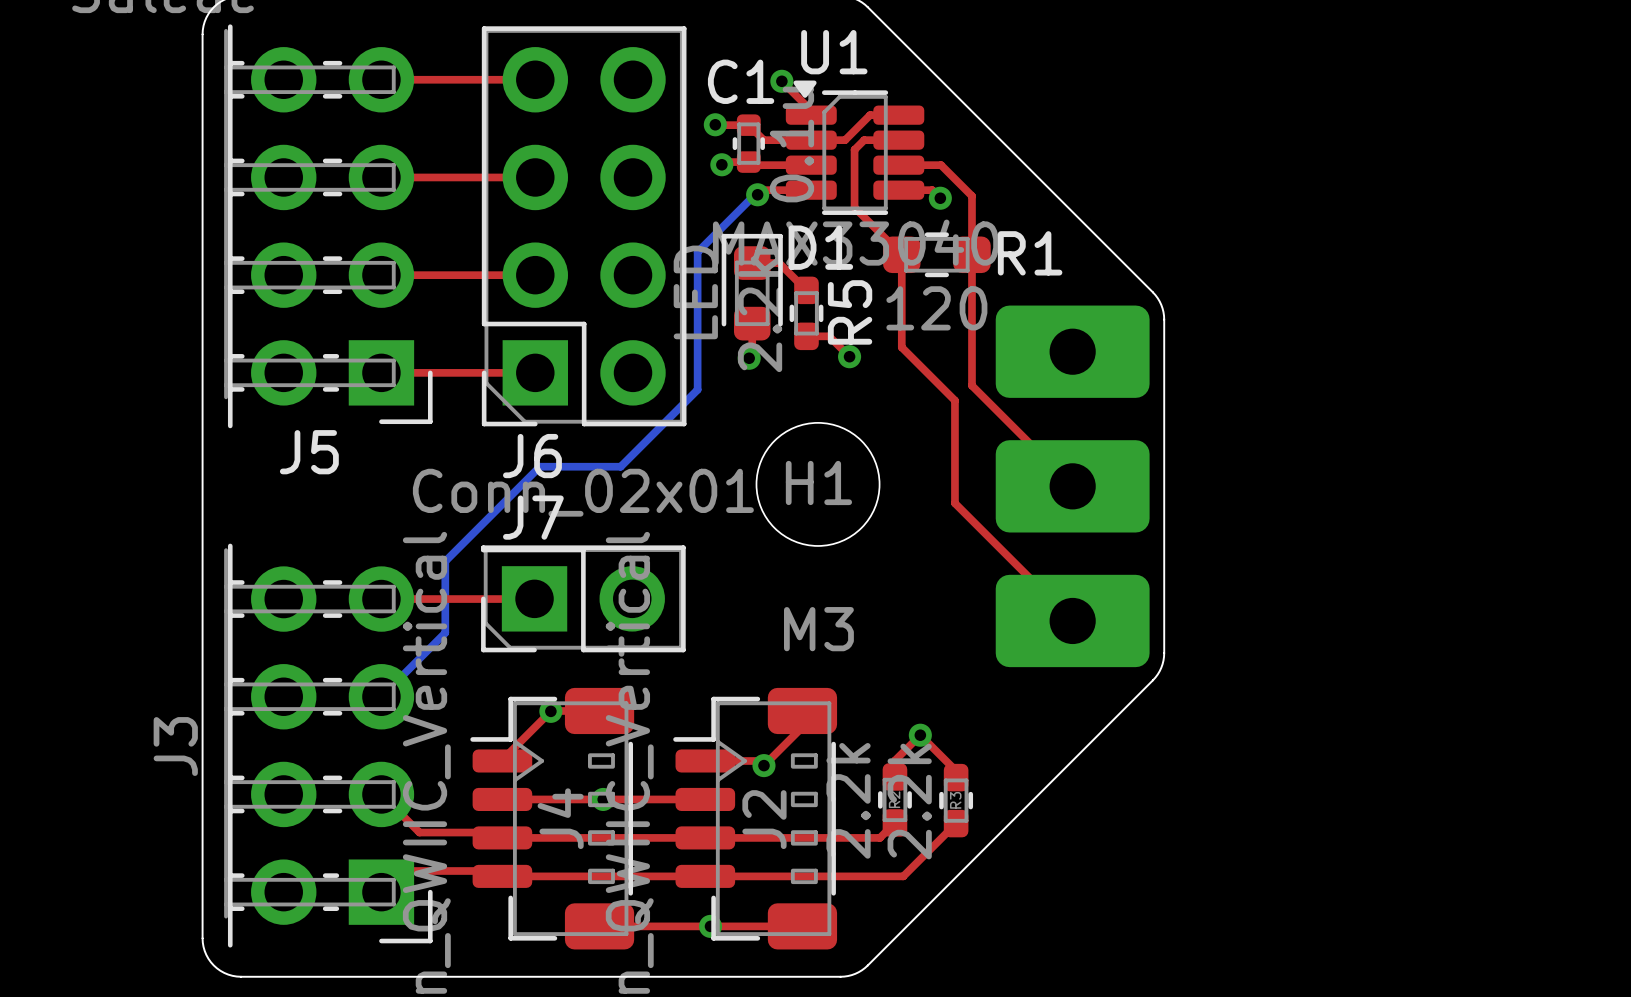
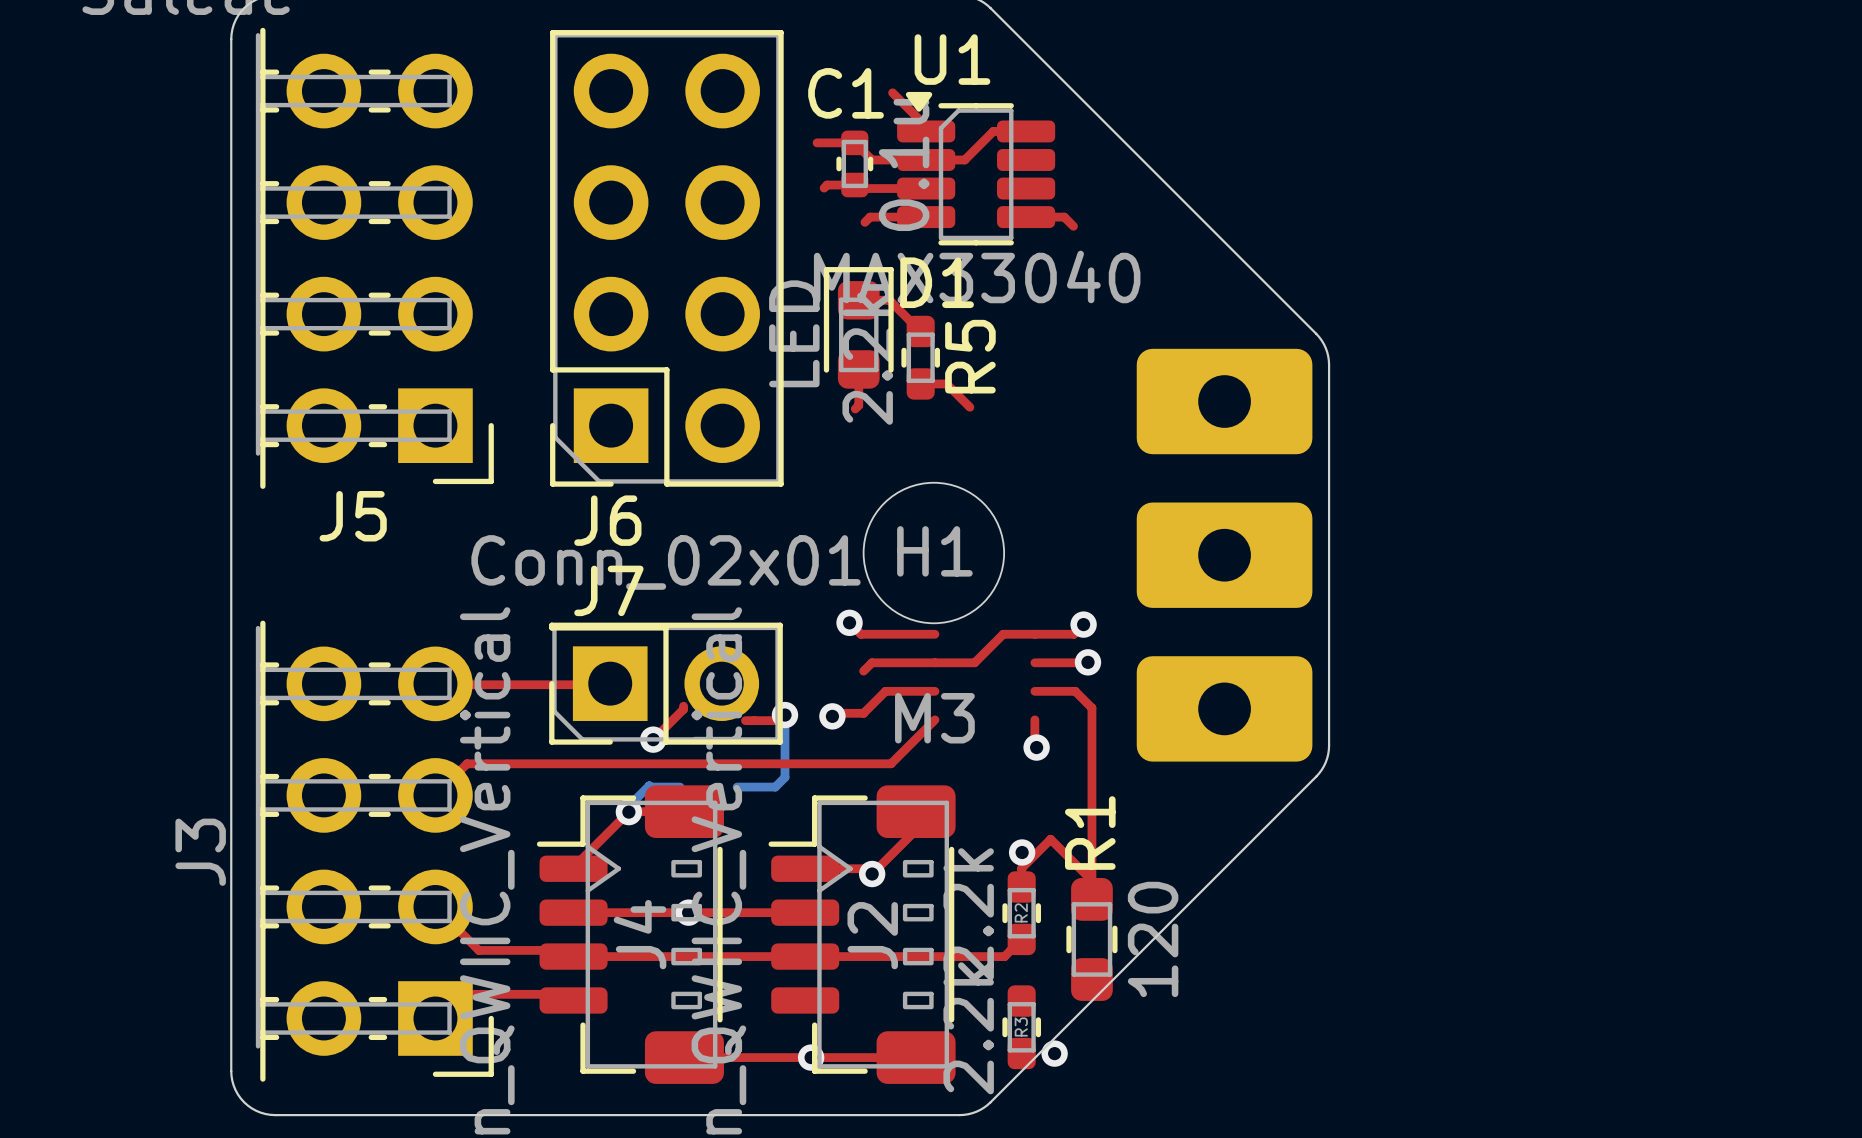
top track: (381, 79) (535, 79) -> none
via: (781, 81) -> none
via: (715, 124) -> none
top track: (898, 140) (864, 140) (854, 149) (854, 207) (901, 254) (901, 347) (954, 400) (954, 503) (1072, 620) -> none
via: (721, 164) -> none
top track: (898, 165) (941, 165) (971, 196) (971, 385) (1072, 486) -> none
top track: (381, 177) (535, 177) -> none
bottom track: (757, 194) (754, 194) (697, 252) (697, 389) (620, 466) (539, 466) (445, 561) (445, 632) (381, 696) -> none
via: (757, 194) -> none
via: (940, 198) -> none
R1 name position: R1 (1030, 253) -> R1 (1090, 833)
R1 rotation: 0° (936, 254) -> 90° clockwise (1091, 939)
R1 position: (936, 254) -> (1091, 939)
top track: (381, 275) (535, 275) -> none
R1 value position: 120 (936, 308) -> 120 (1153, 939)
via: (849, 356) -> none
via: (749, 358) -> none
top track: (381, 372) (535, 372) -> none
top track: none -> (849, 622) (860, 634) (934, 634)
via: none -> (849, 622)
top track: none -> (1083, 624) (1073, 634) (1003, 634) (974, 662) (871, 662) (863, 671)
via: none -> (1083, 624)
top track: none -> (1034, 662) (1087, 662)
via: none -> (1088, 662)
top track: (381, 599) (534, 599) -> (436, 684) (578, 684)
top track: none -> (934, 691) (885, 691) (863, 713) (835, 713) (832, 716)
top track: none -> (1034, 691) (1075, 691) (1091, 708) (1091, 899)
top track: none -> (683, 706) (683, 709) (653, 739)
top track: none -> (785, 715) (779, 720) (745, 720)
bottom track: none -> (785, 715) (785, 777) (775, 787) (737, 787)
via: none -> (785, 715)
via: none -> (832, 716)
top track: none -> (934, 719) (891, 763) (467, 763) (435, 795)
top track: none -> (1034, 719) (1034, 745) (1036, 747)
via: none -> (653, 739)
via: none -> (1036, 747)
bottom track: none -> (680, 787) (649, 785) (629, 805)
via position: (920, 735) -> (1022, 852)
R3 position: (956, 800) -> (1021, 1027)
top track: (956, 823) (903, 876) (502, 876) -> none
via: none -> (1054, 1053)

